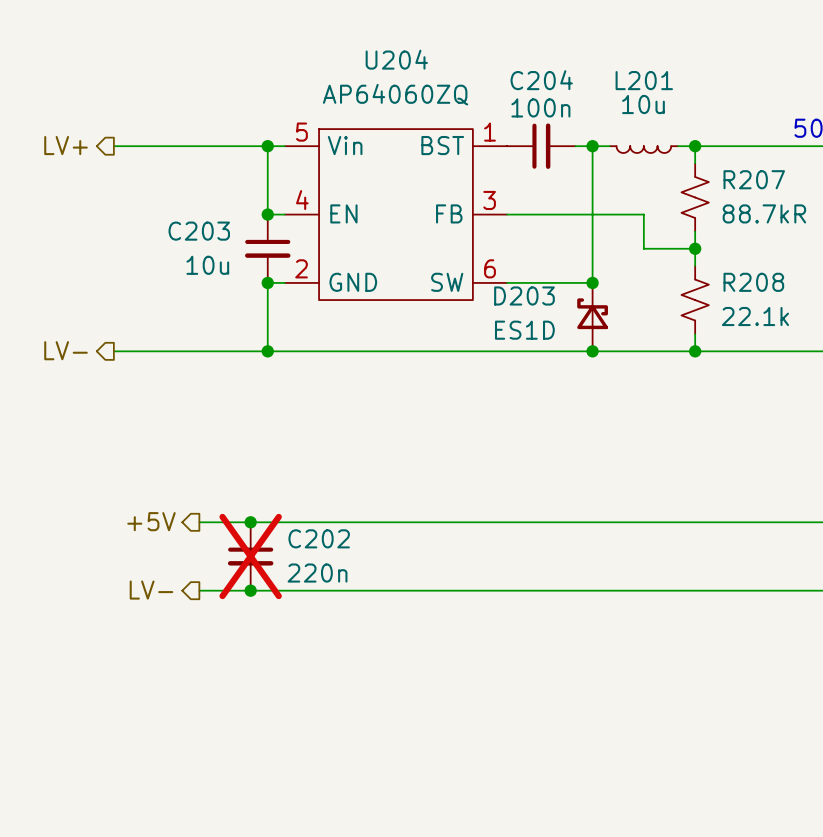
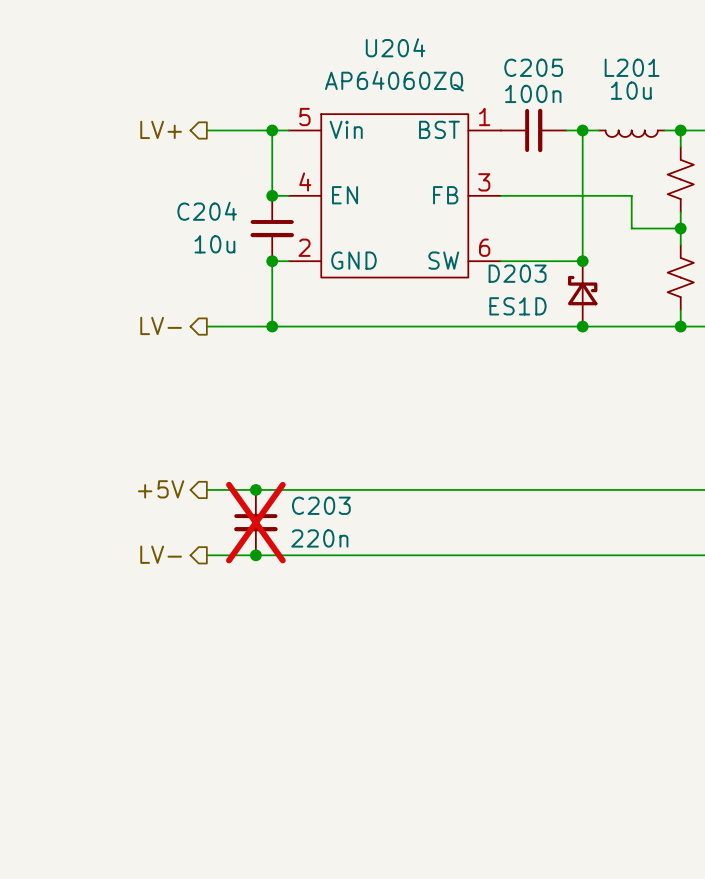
C204 name: C204 (541, 80) -> C205 (533, 67)
hierarchical label position: LV+ (66, 145) -> LV+ (161, 129)
wire: (113, 146) (199, 146) -> none
C203 name: C203 (199, 231) -> C204 (207, 211)
hierarchical label position: LV- (66, 350) -> LV- (161, 325)
wire: (113, 351) (199, 351) -> none
C202 name: C202 (319, 538) -> C203 (321, 505)

